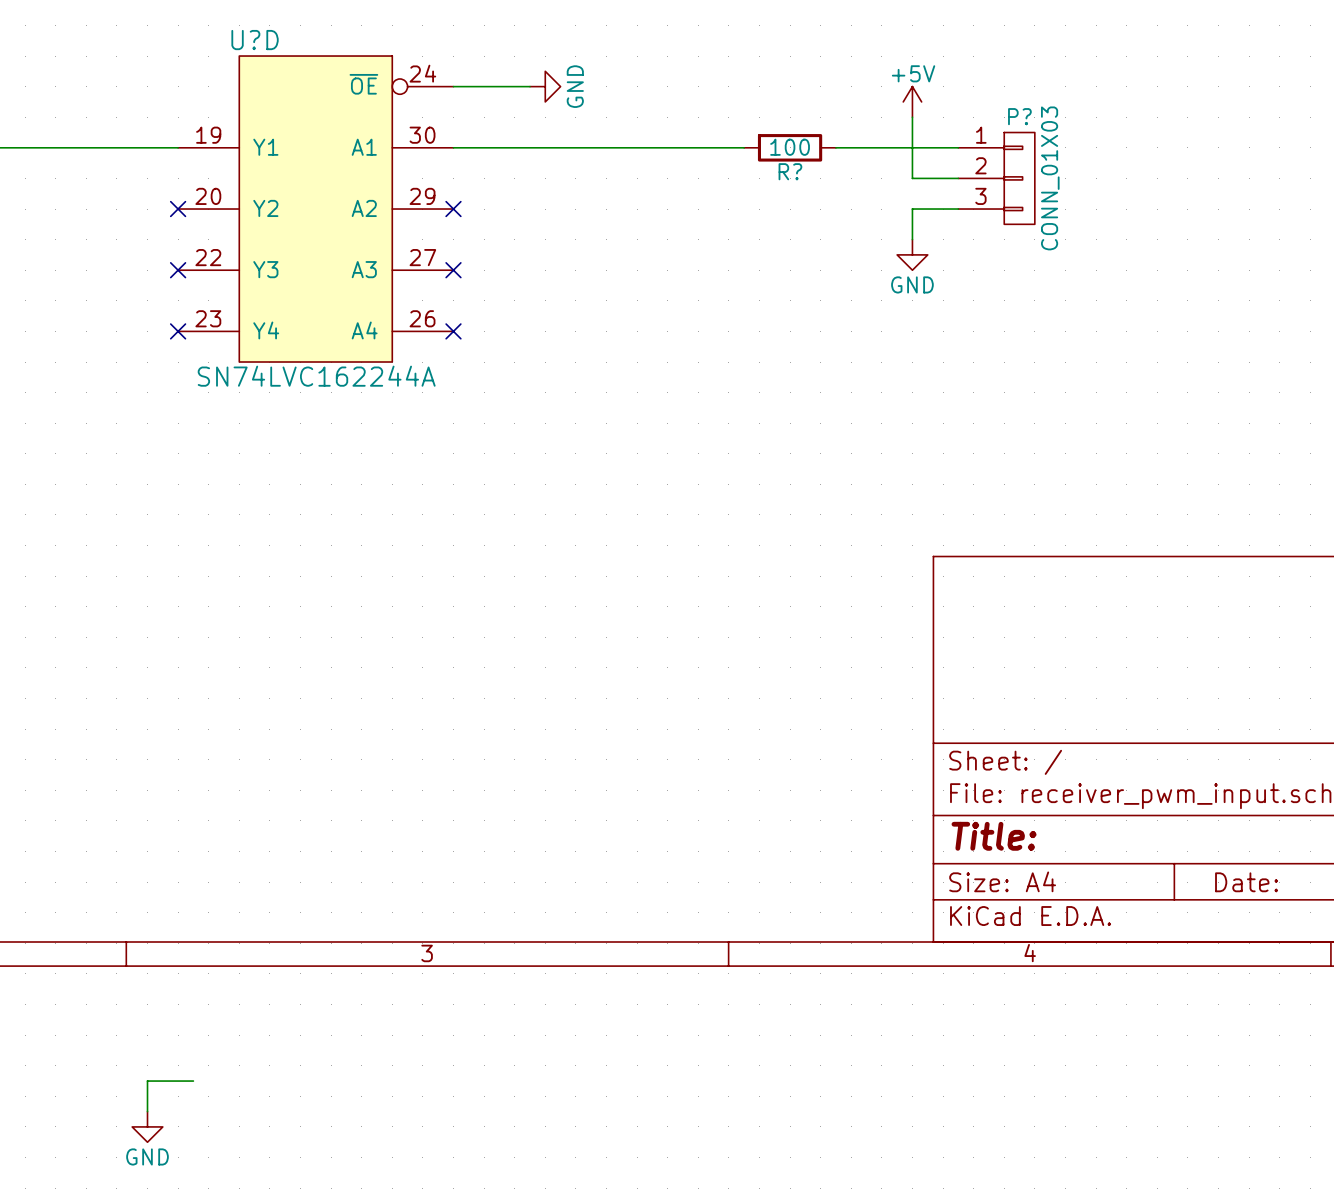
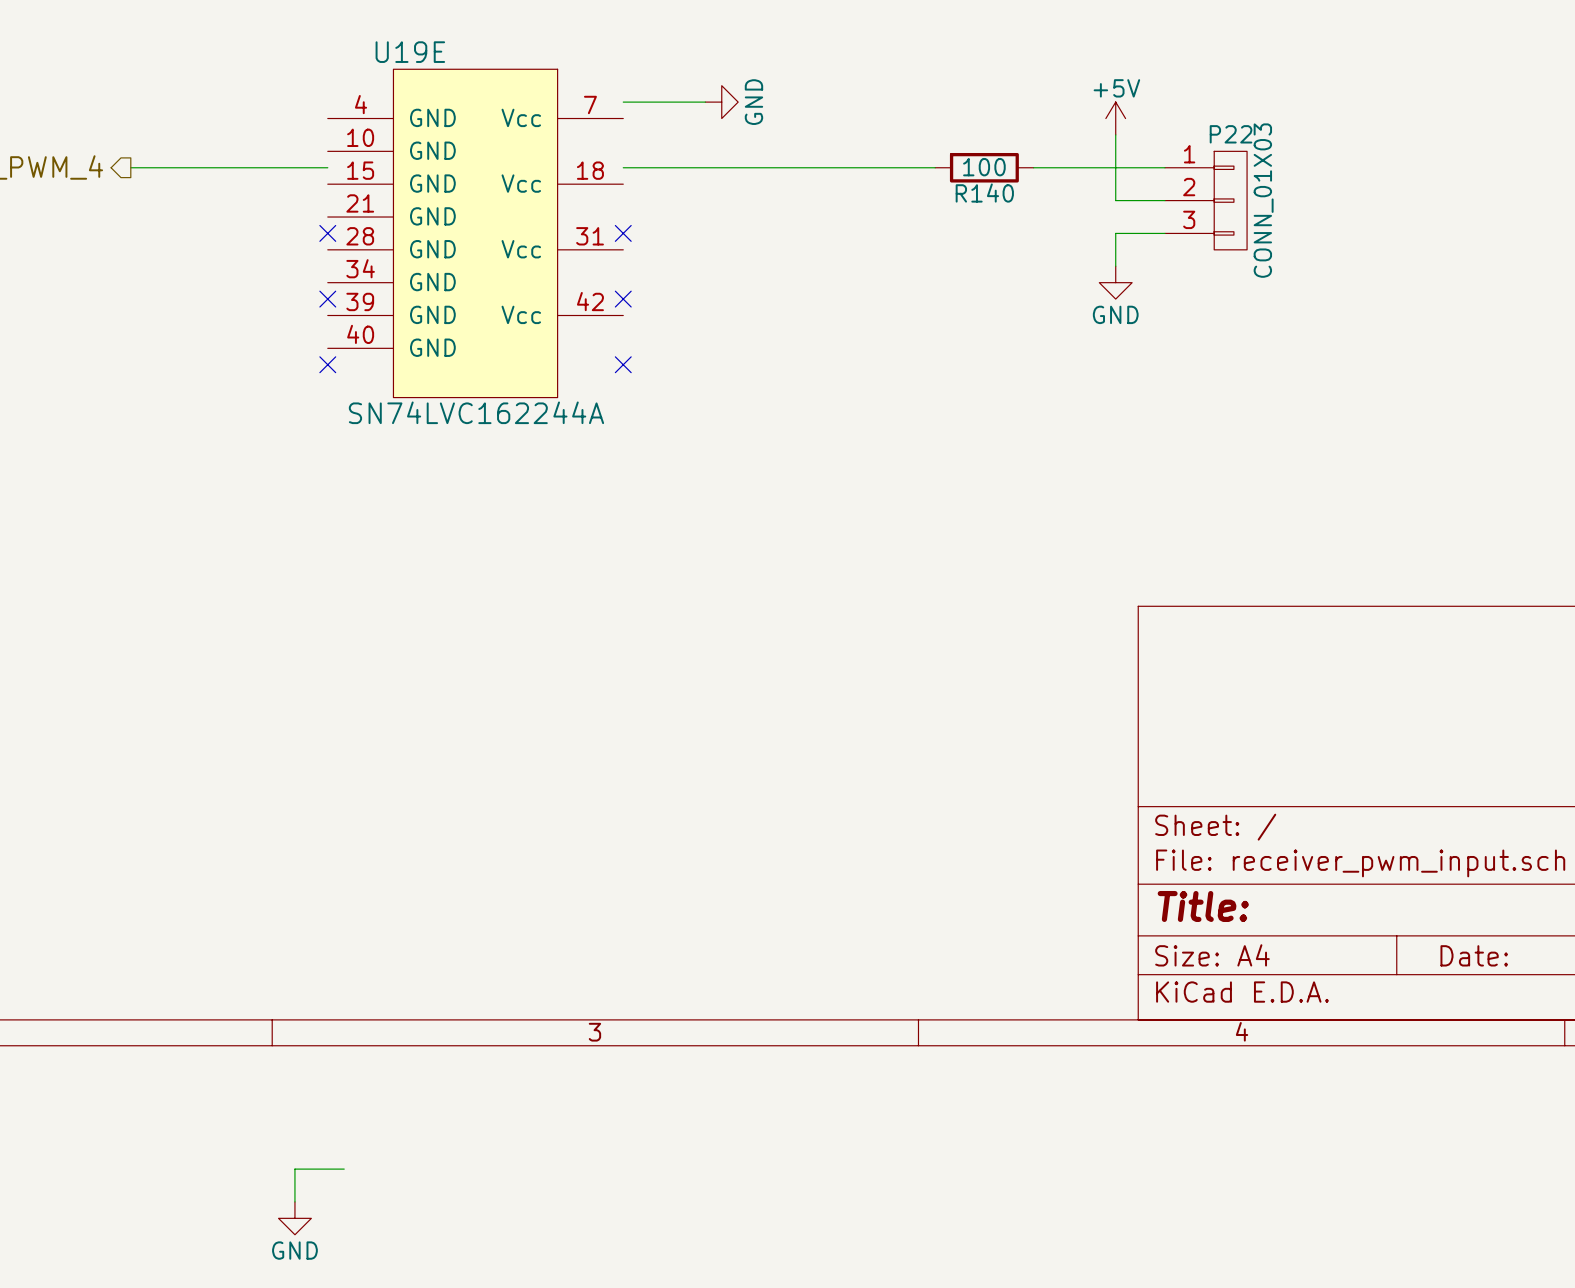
P? name: P? (1019, 116) -> P22 (1231, 134)
R? name: R? (790, 171) -> R140 (984, 193)
U?D: SN74LVC162244A (315, 209) -> none
U19E: none -> SN74LVC162244A (475, 233)

